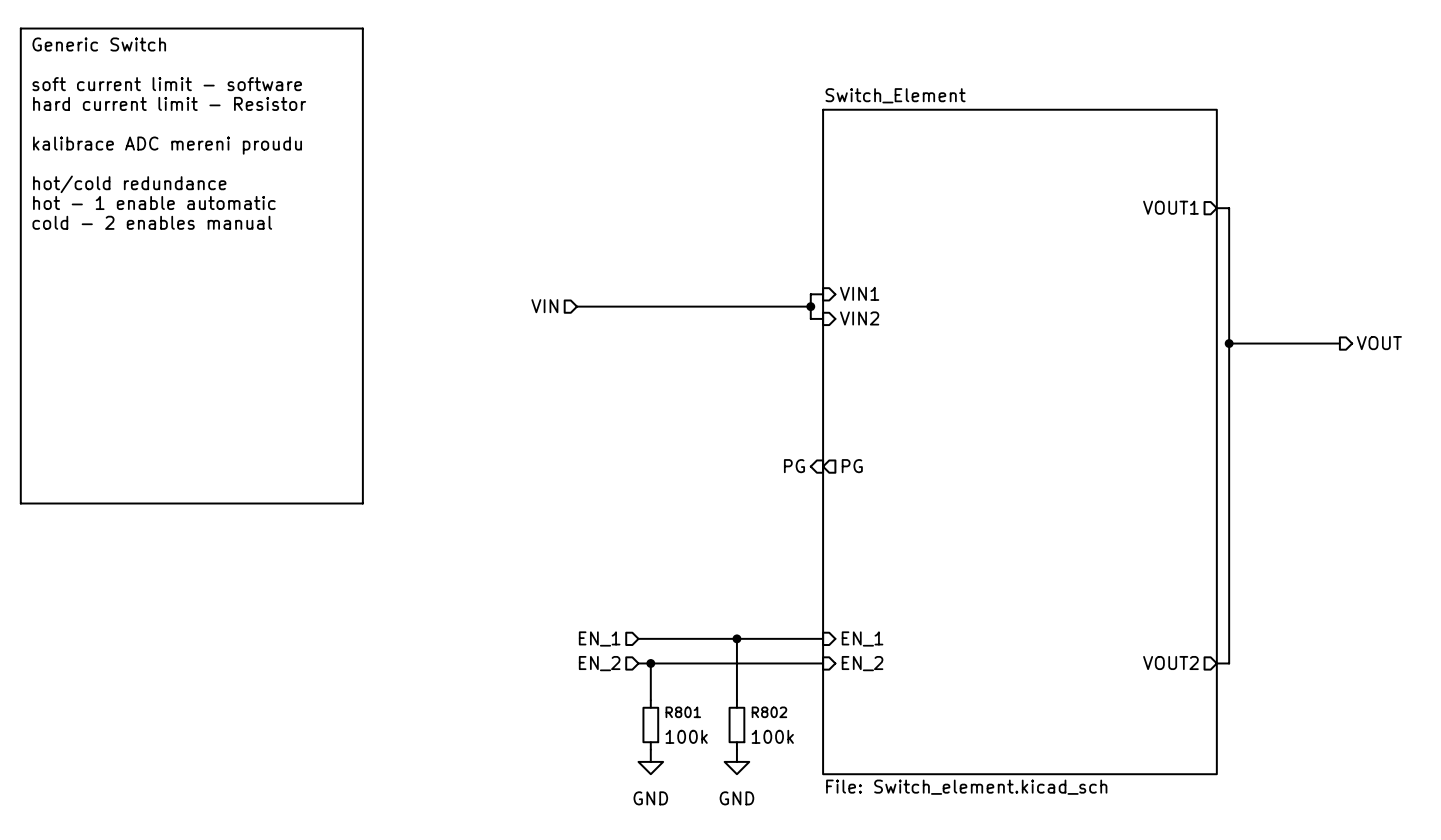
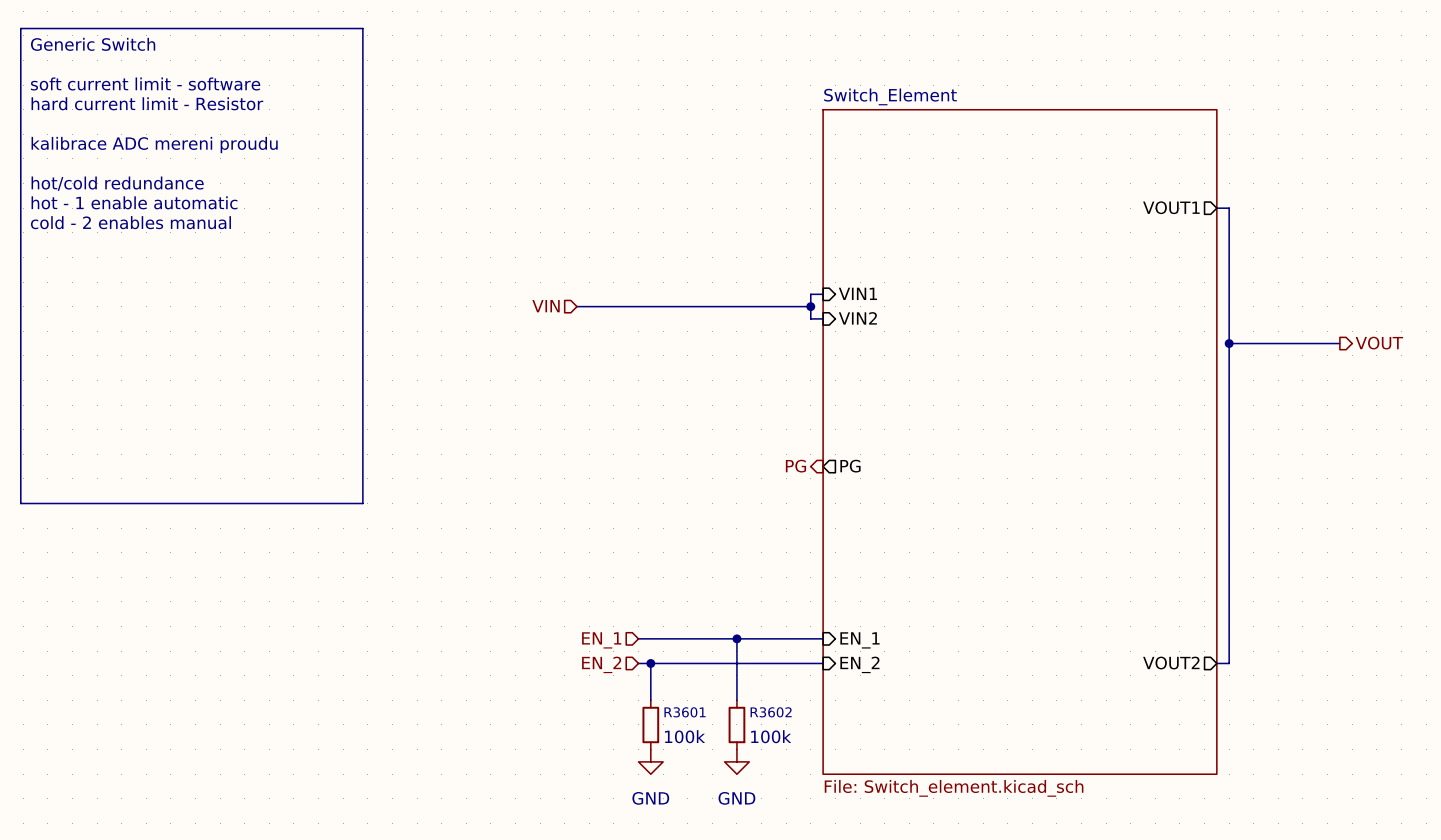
R801 name: R801 (683, 712) -> R3601 (685, 712)
R802 name: R802 (769, 712) -> R3602 (771, 712)

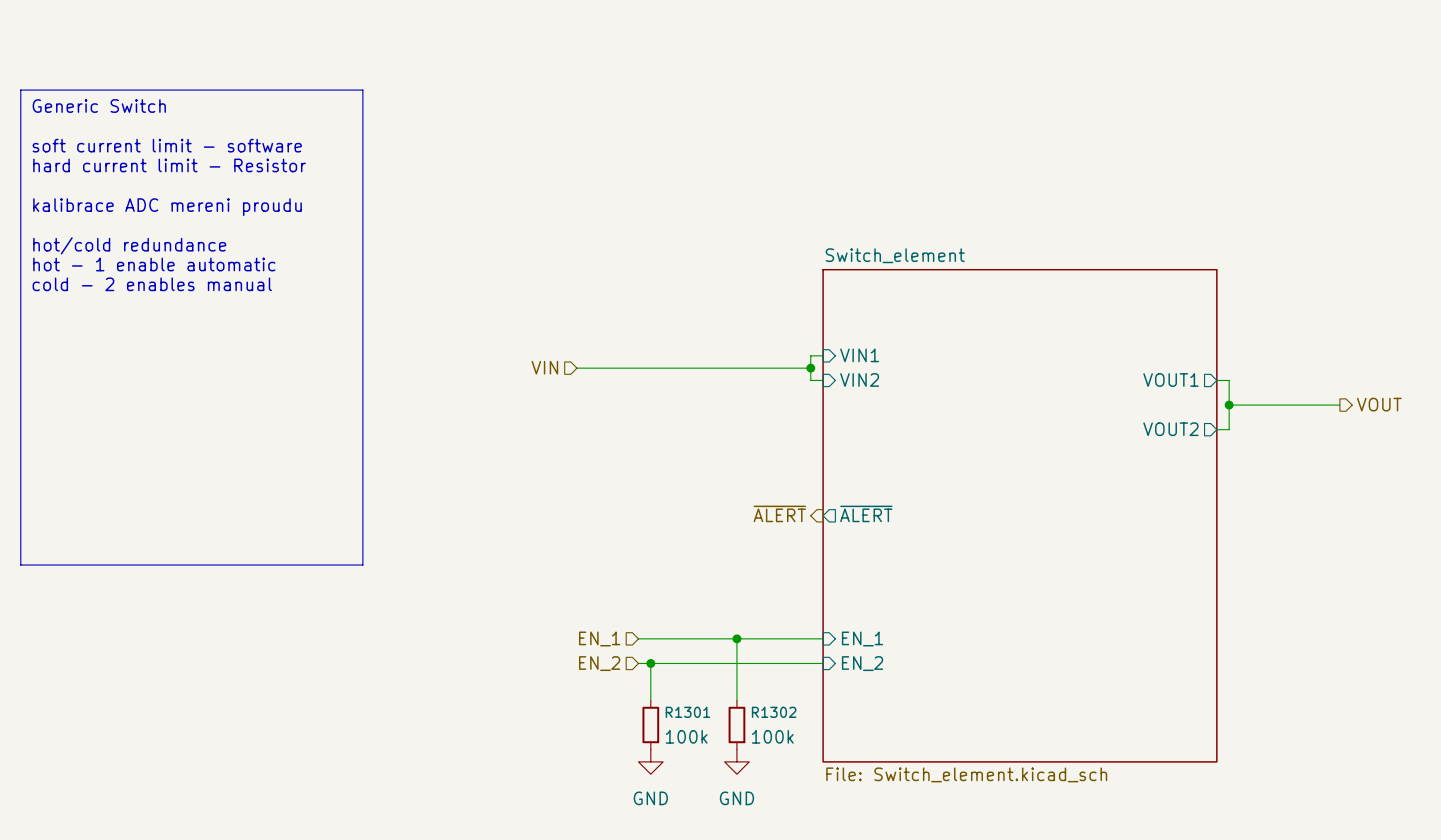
text position: Generic Switch (93, 44) -> Generic Switch (99, 106)
text position: soft current limit - software (145, 83) -> soft current limit - software (167, 145)
line: (20, 90) (20, 28) (362, 28) (362, 90) -> (20, 90) (362, 90)
text position: hard current limit - Resistor (147, 103) -> hard current limit - Resistor (169, 165)
text position: kalibrace ADC mereni proudu (154, 145) -> kalibrace ADC mereni proudu (167, 207)
text position: hot/cold redundance (117, 183) -> hot/cold redundance (129, 245)
text position: hot - 1 enable automatic (134, 202) -> hot - 1 enable automatic (154, 264)
sheet pin position: VOUT1 (1171, 207) -> VOUT1 (1170, 379)
wire: (1216, 208) (1229, 208) (1229, 380) -> (1216, 380) (1229, 380)
text position: cold - 2 enables manual (130, 222) -> cold - 2 enables manual (152, 284)
sheet pin position: VIN1 (857, 293) -> VIN1 (859, 355)
wire: (823, 294) (810, 294) (810, 318) (823, 318) -> (823, 355) (810, 355) (810, 380) (823, 380)
hierarchical label position: VIN (546, 306) -> VIN (544, 367)
wire: (576, 306) (810, 306) -> (576, 368) (810, 368)
junction: (810, 306) -> none
sheet pin position: VIN2 (857, 318) -> VIN2 (859, 379)
wire: (1229, 343) (1339, 343) -> (1229, 405) (1339, 405)
junction: (1229, 343) -> none
hierarchical label position: VOUT (1379, 343) -> VOUT (1379, 404)
junction: none -> (810, 368)
junction: none -> (1229, 405)
wire: (1229, 429) (1229, 663) (1216, 663) -> (1229, 429) (1216, 429)
sheet Switch_Element: File: Switch_element.kicad_sch (1019, 441) -> none
hierarchical label: PG (795, 466) -> none
sheet pin: PG (850, 466) -> none
line: (20, 503) (362, 503) -> (20, 503) (20, 565) (362, 565) (362, 503)
hierarchical label: none -> ~{ALERT} (779, 513)
sheet pin: none -> ~{ALERT} (866, 513)
sheet Switch_element: none -> File: Switch_element.kicad_sch (1019, 515)
sheet pin position: VOUT2 (1171, 663) -> VOUT2 (1170, 429)
R3601 name: R3601 (685, 712) -> R1301 (688, 712)
R3602 name: R3602 (771, 712) -> R1302 (774, 712)

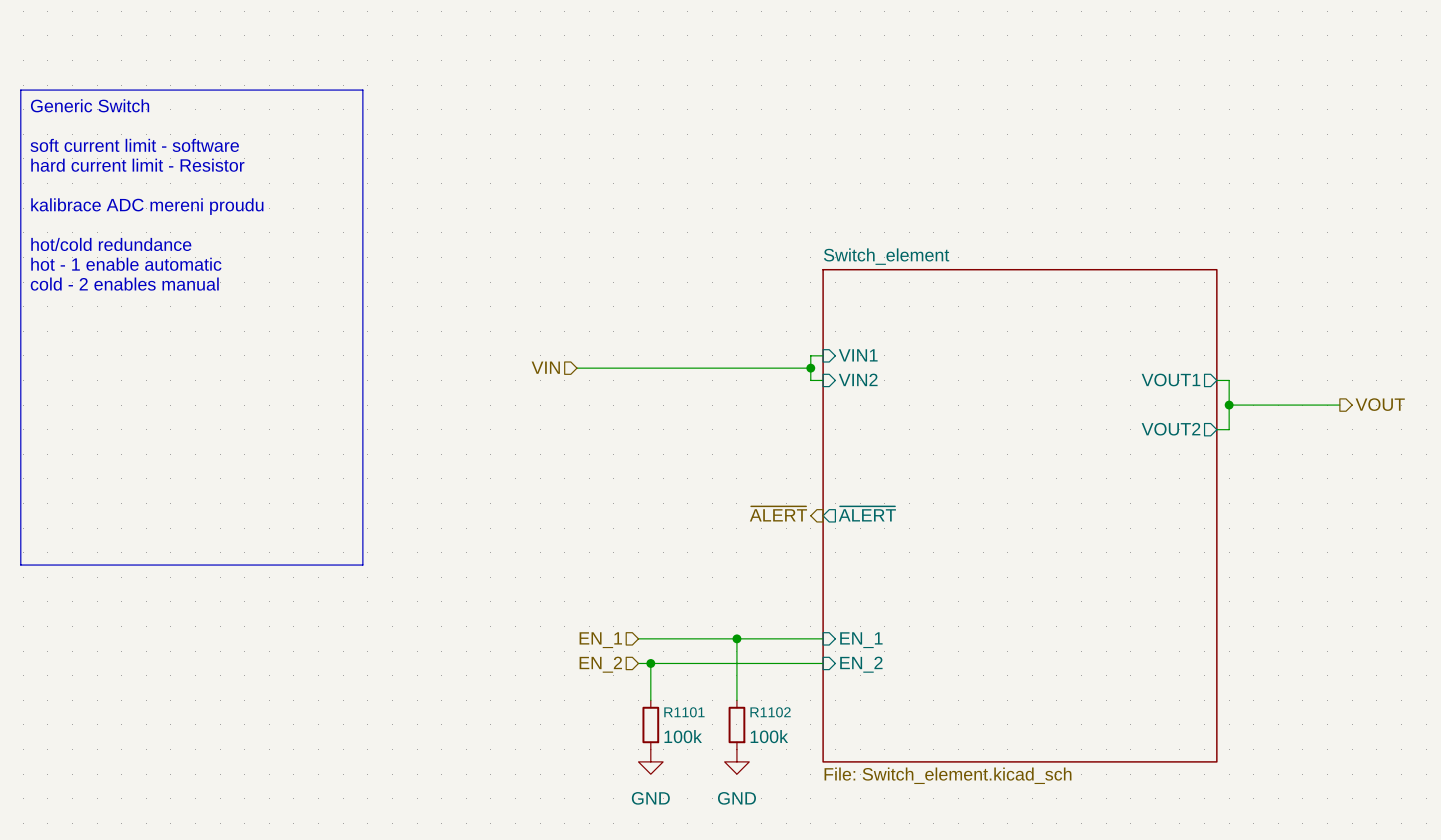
R1301 name: R1301 (688, 712) -> R1101 (684, 712)
R1302 name: R1302 (774, 712) -> R1102 (770, 712)

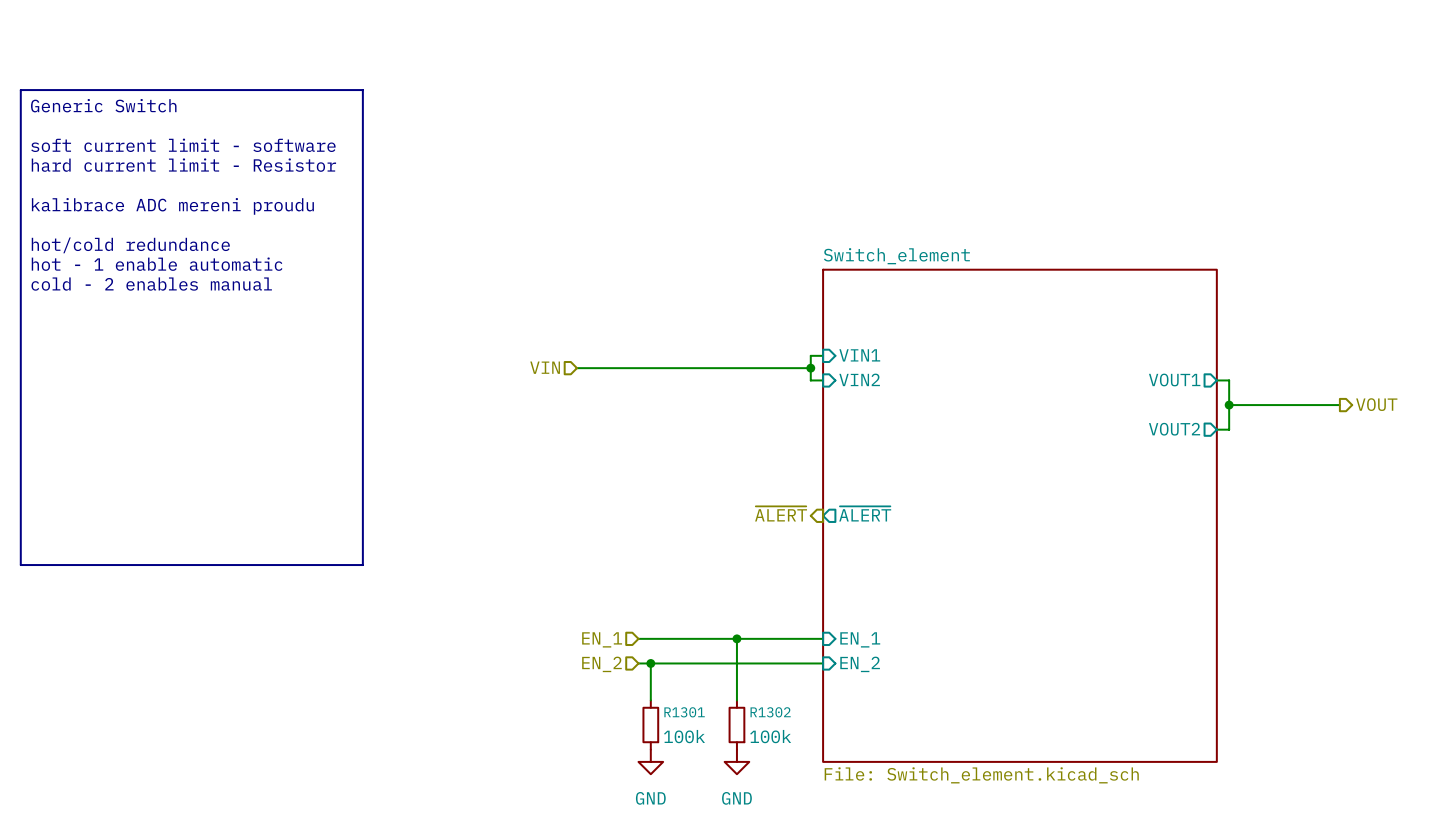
R1101 name: R1101 (684, 712) -> R1301 (684, 712)
R1102 name: R1102 (770, 712) -> R1302 (770, 712)

